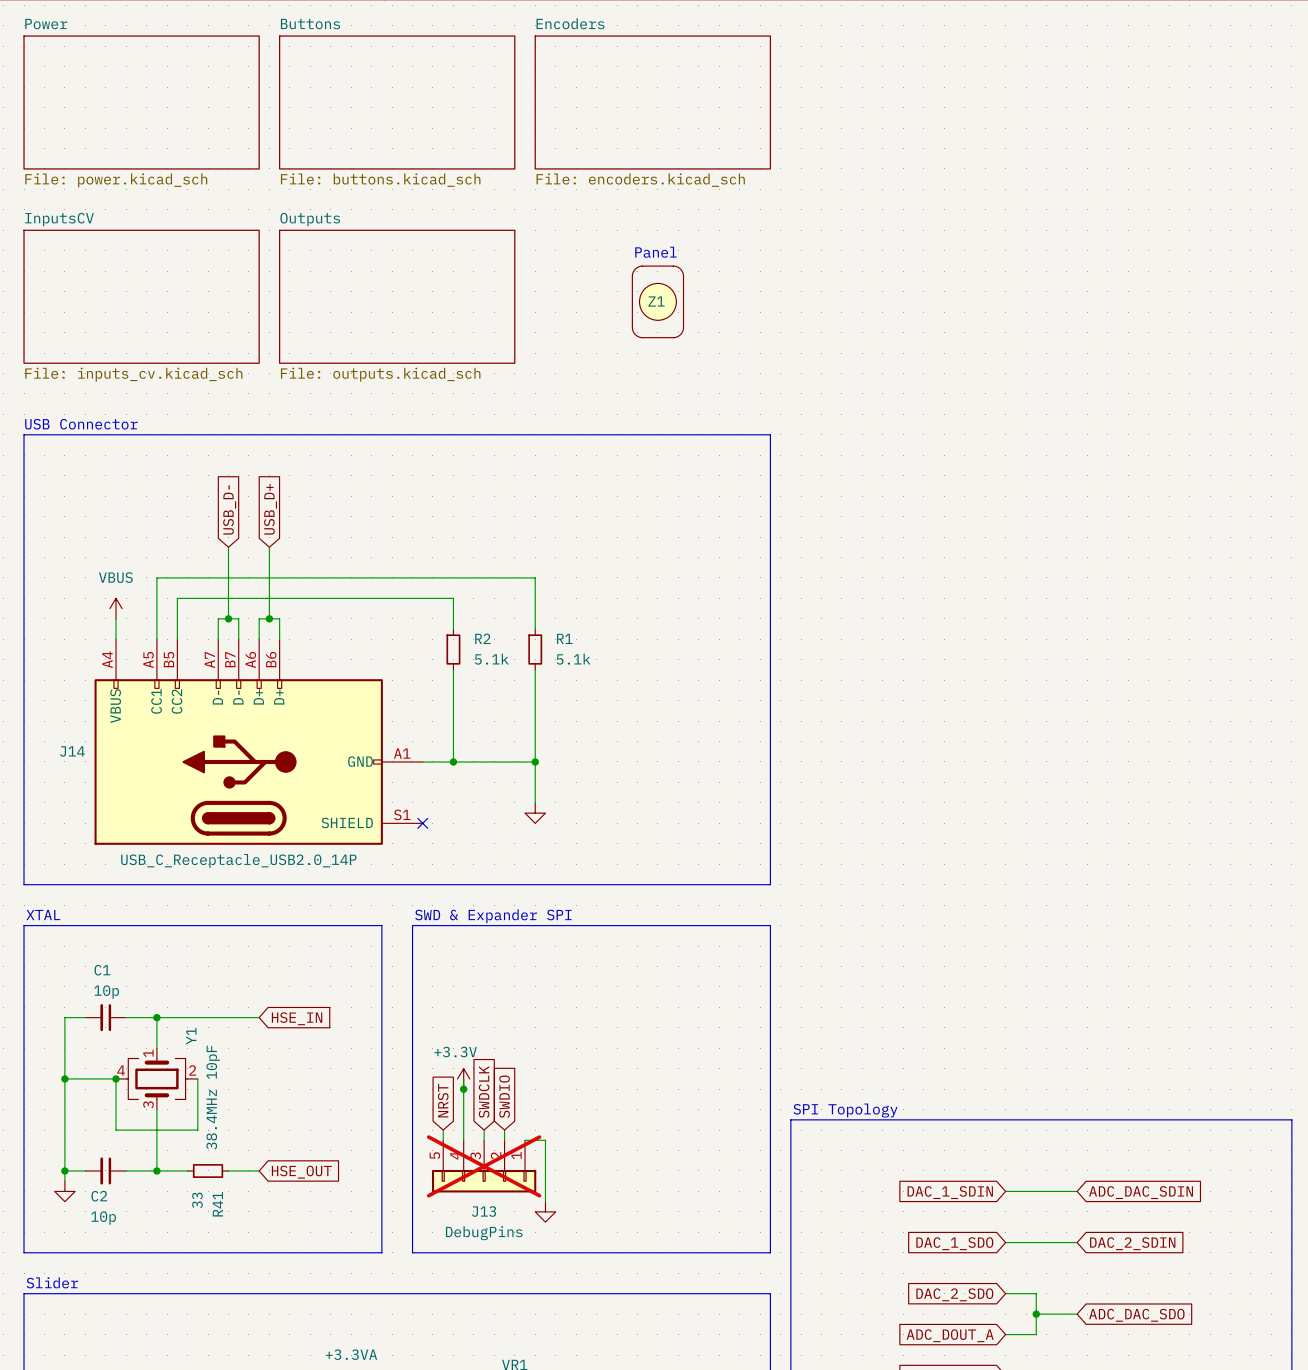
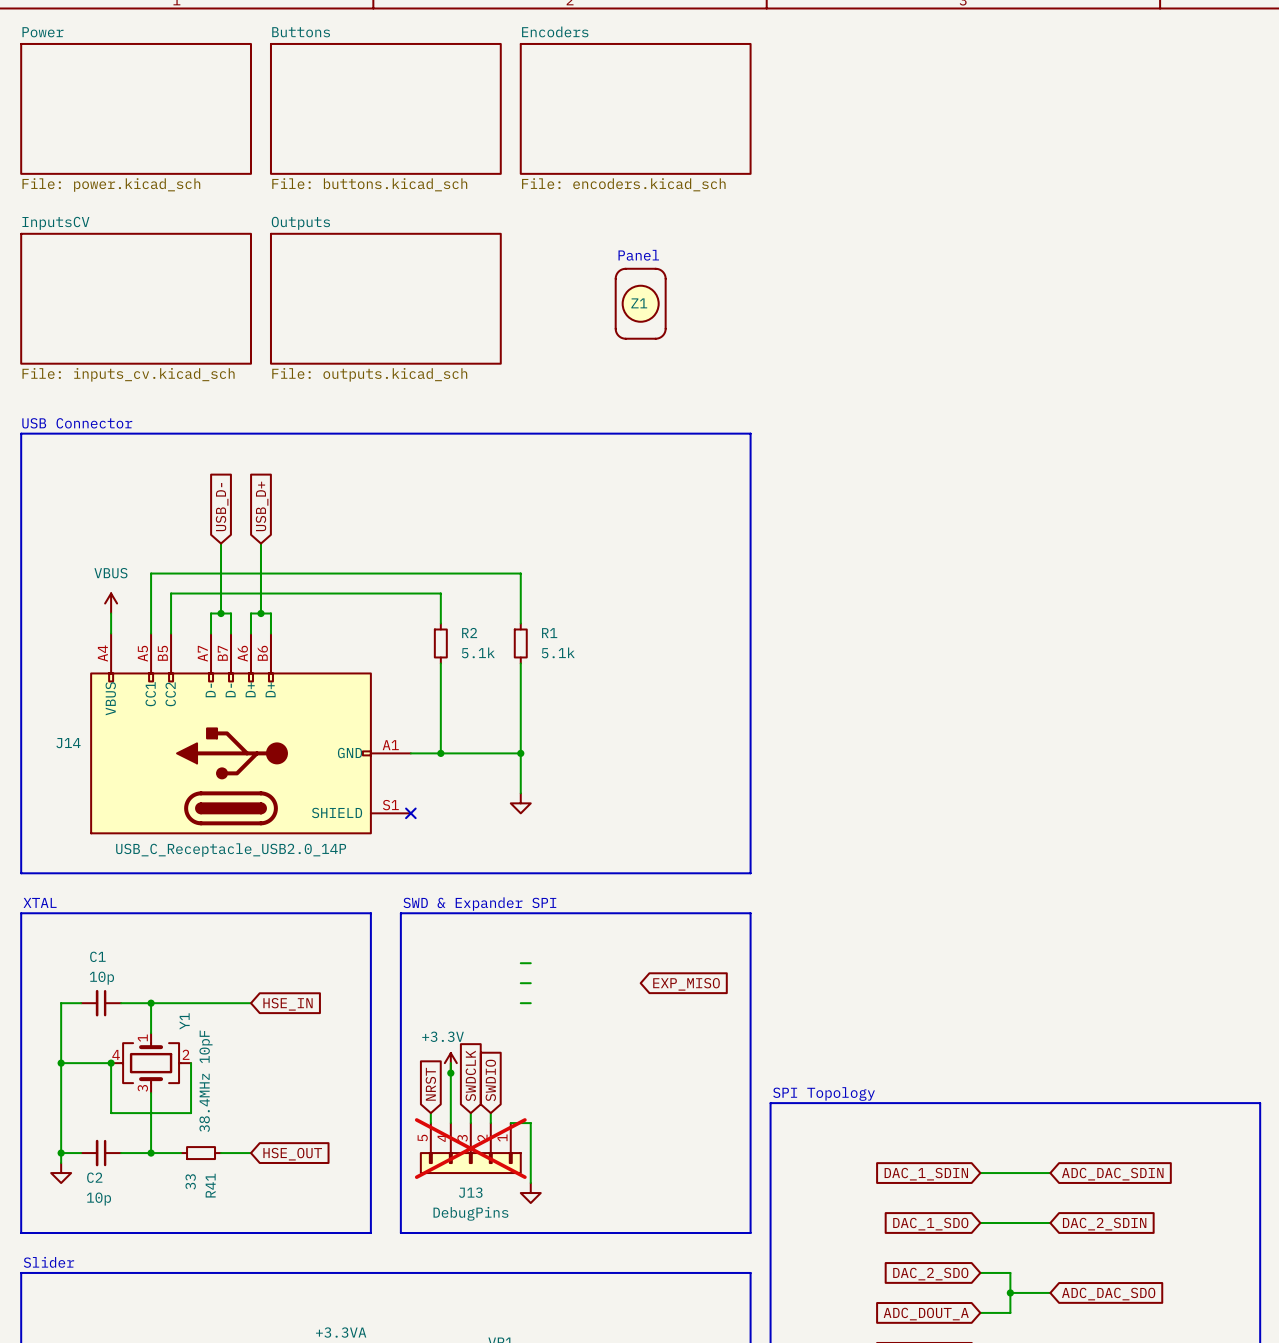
wire: none -> (520, 963) (530, 963)
wire: none -> (520, 983) (530, 983)
global label: none -> EXP_MISO (686, 984)
wire: none -> (520, 1003) (530, 1003)

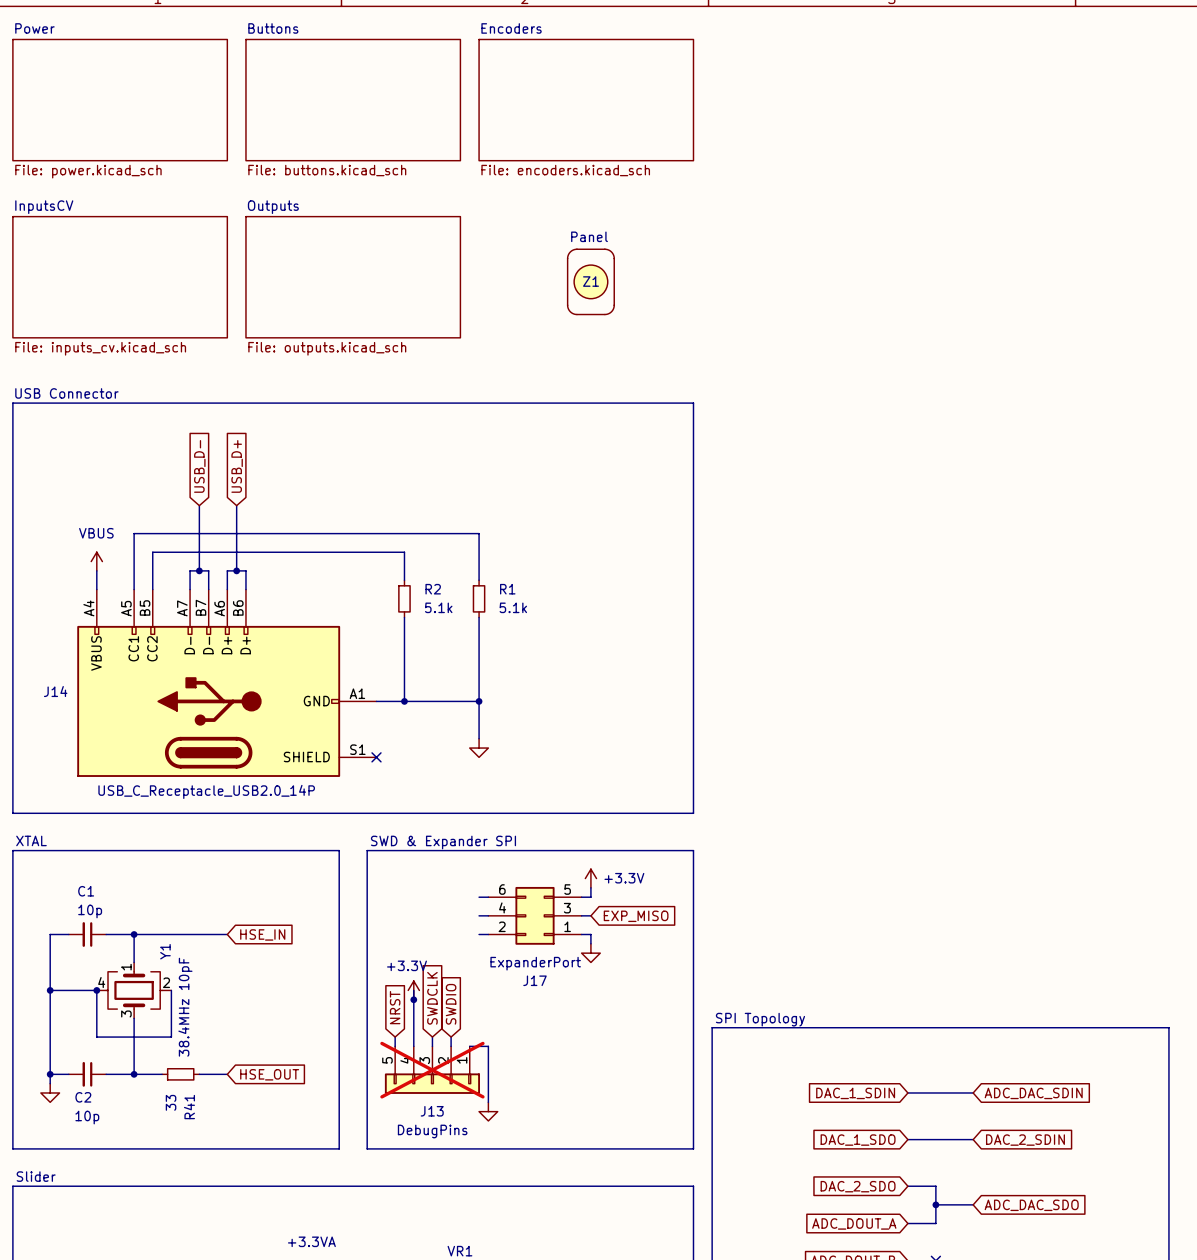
power symbol: none -> +3.3V (590, 878)
wire: none -> (590, 887) (590, 897) (581, 897)
J17: none -> ExpanderPort (534, 915)
wire: none -> (581, 915) (590, 915)
wire: none -> (581, 934) (590, 934) (590, 943)
power symbol: none -> (590, 953)

